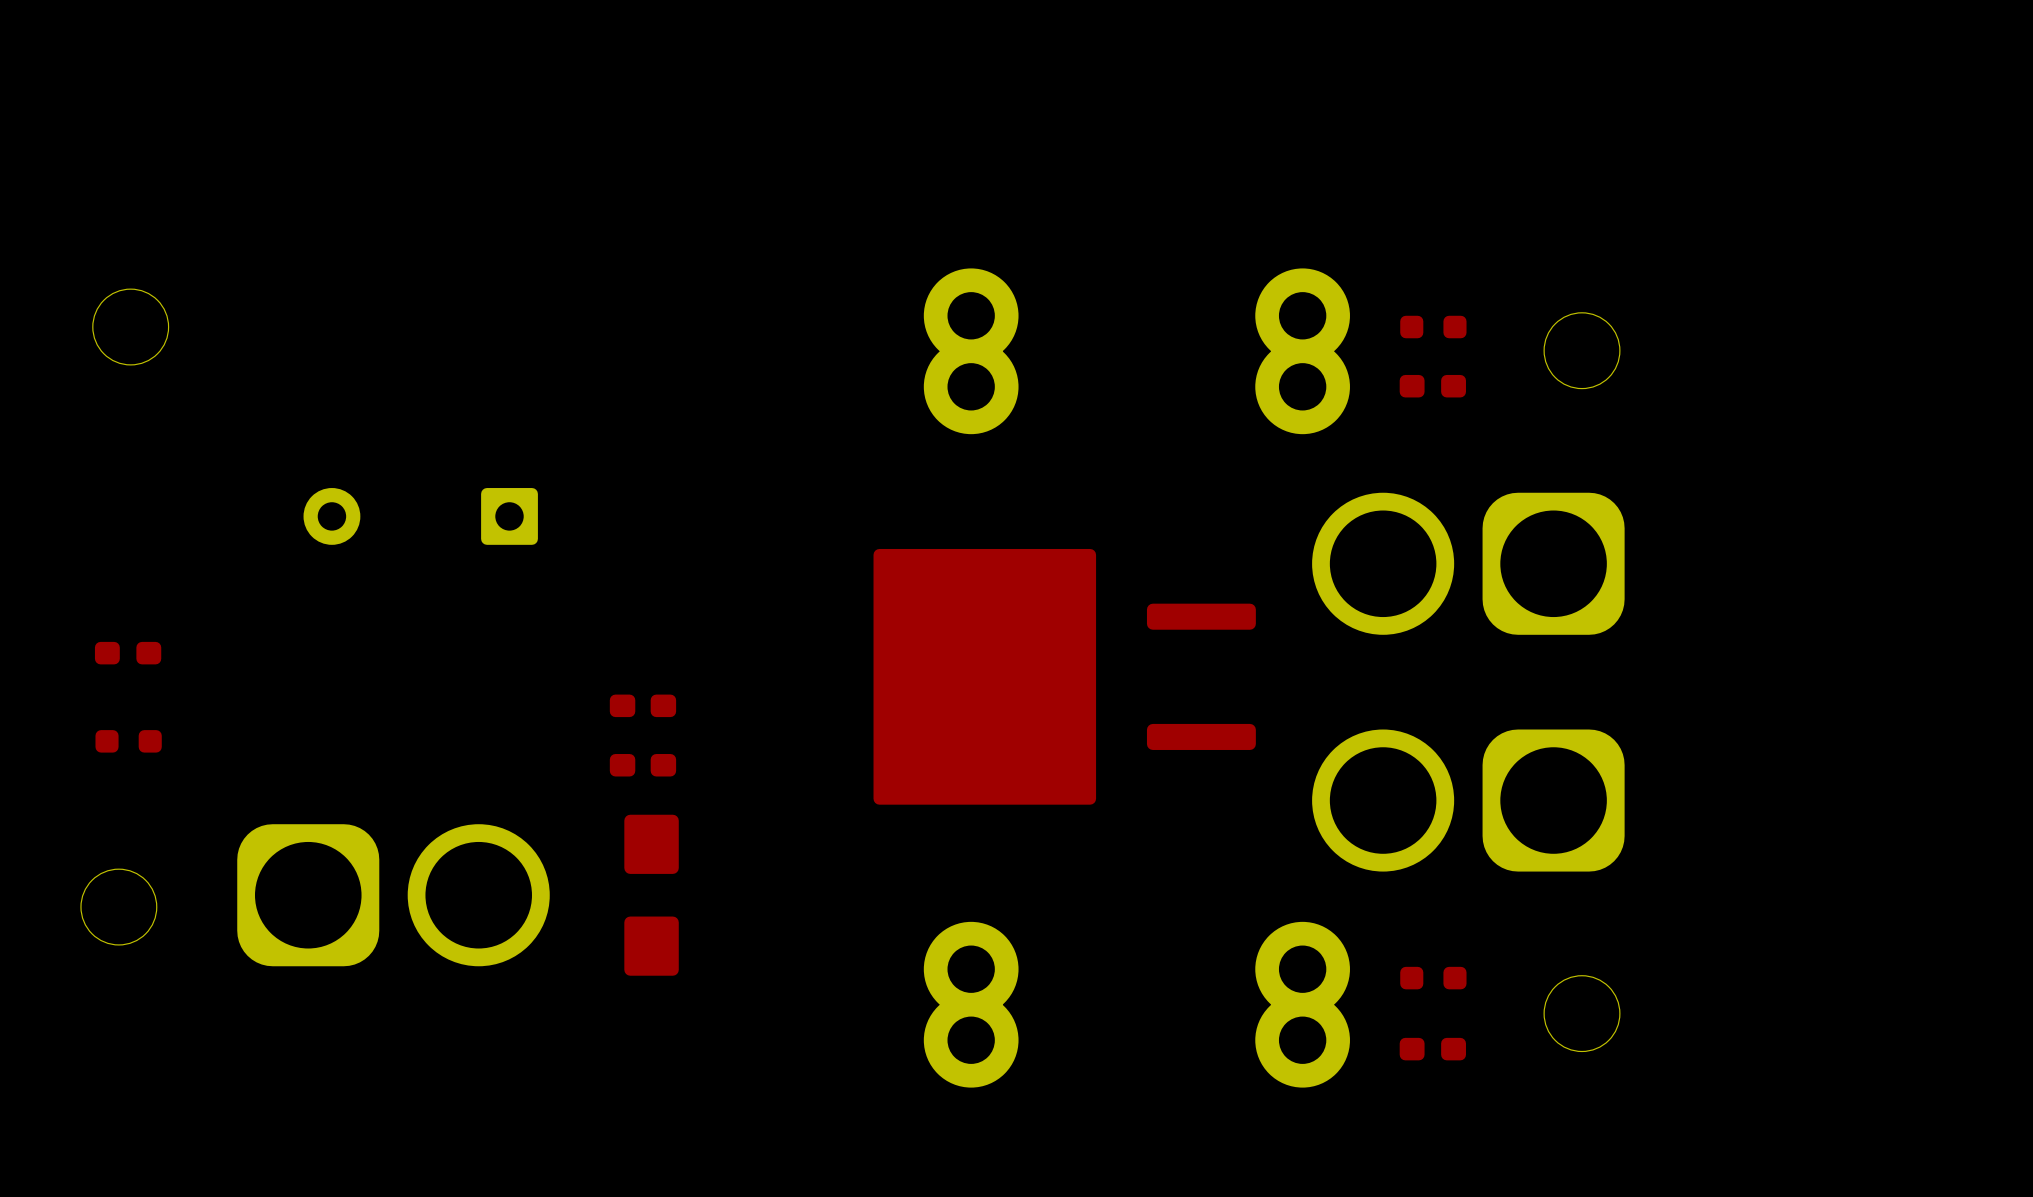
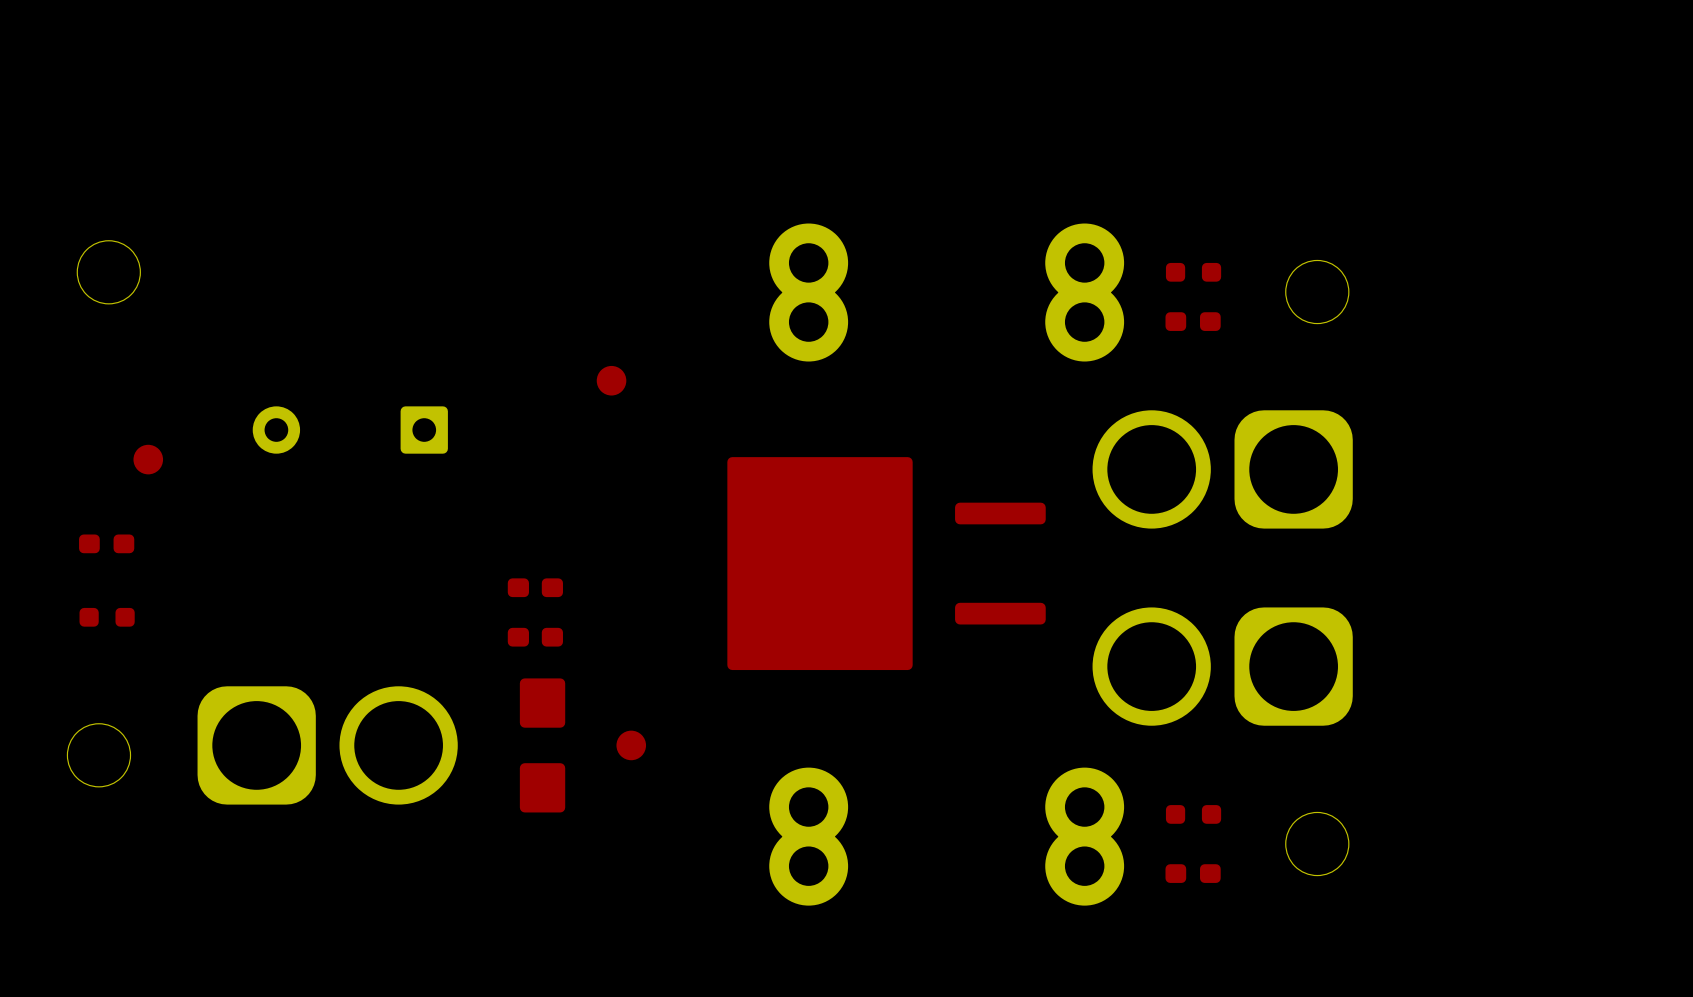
part: none -> (611, 380)
part: none -> (148, 459)
part: none -> (631, 745)

